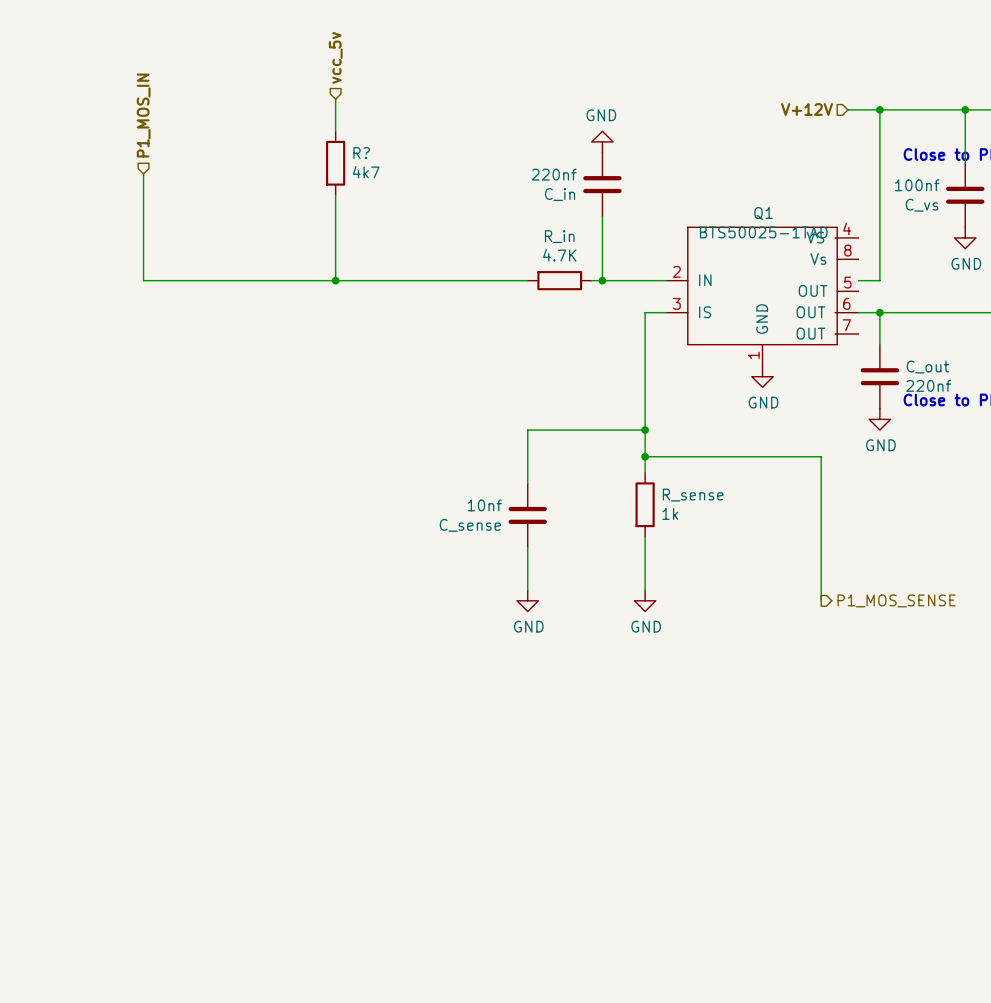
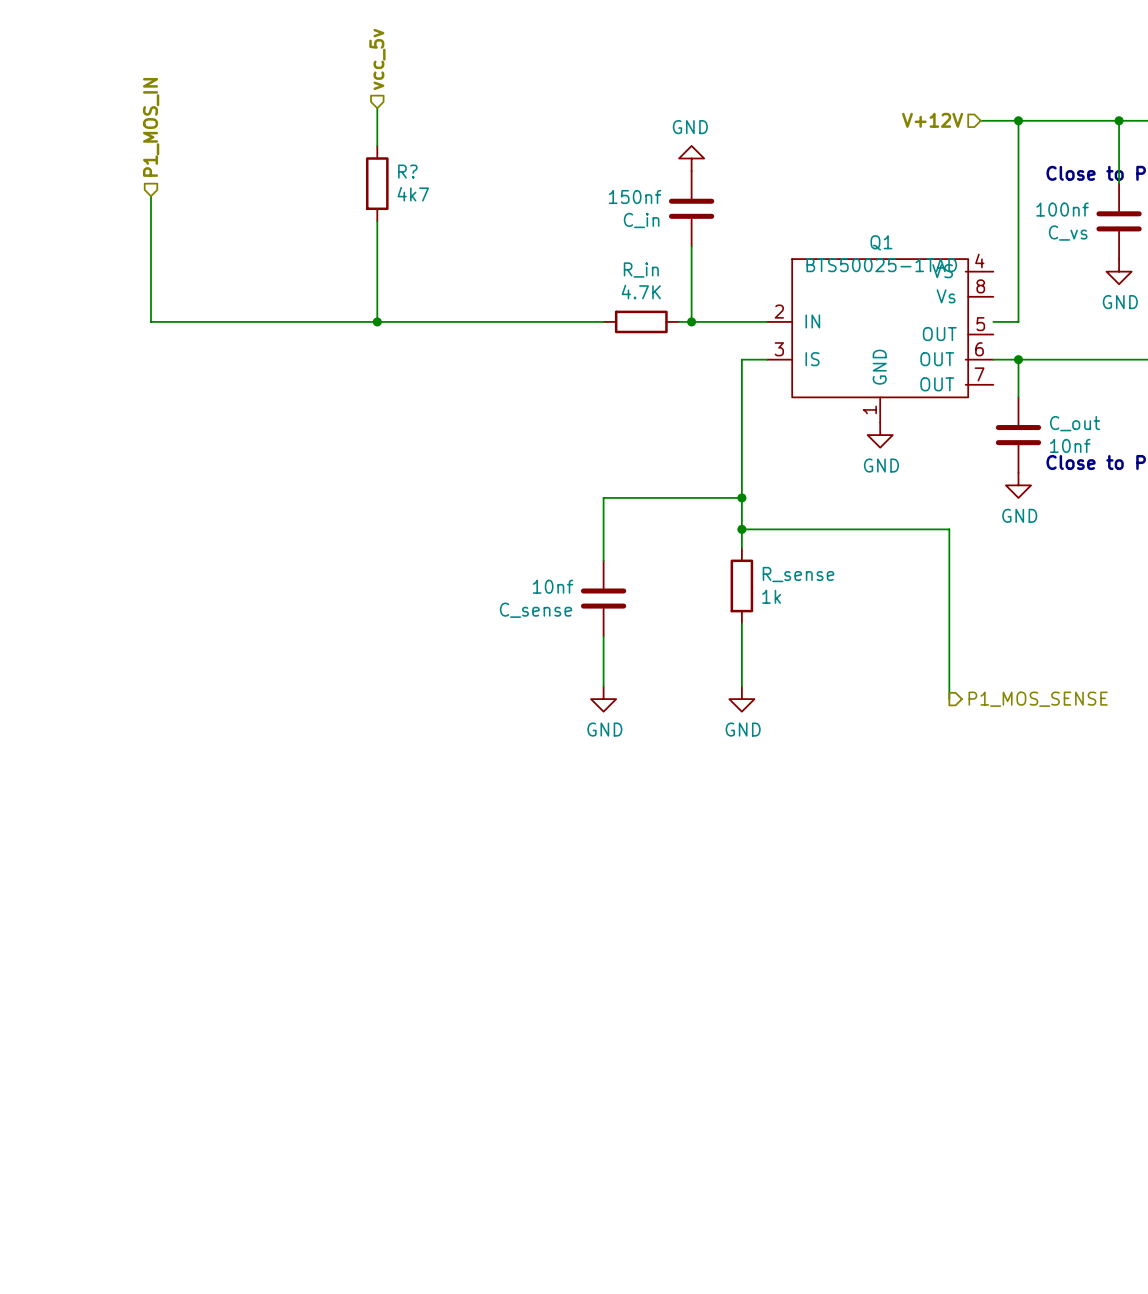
C_in value: 220nf (554, 174) -> 150nf (635, 197)
C_out value: 220nf (928, 385) -> 10nf (1070, 445)

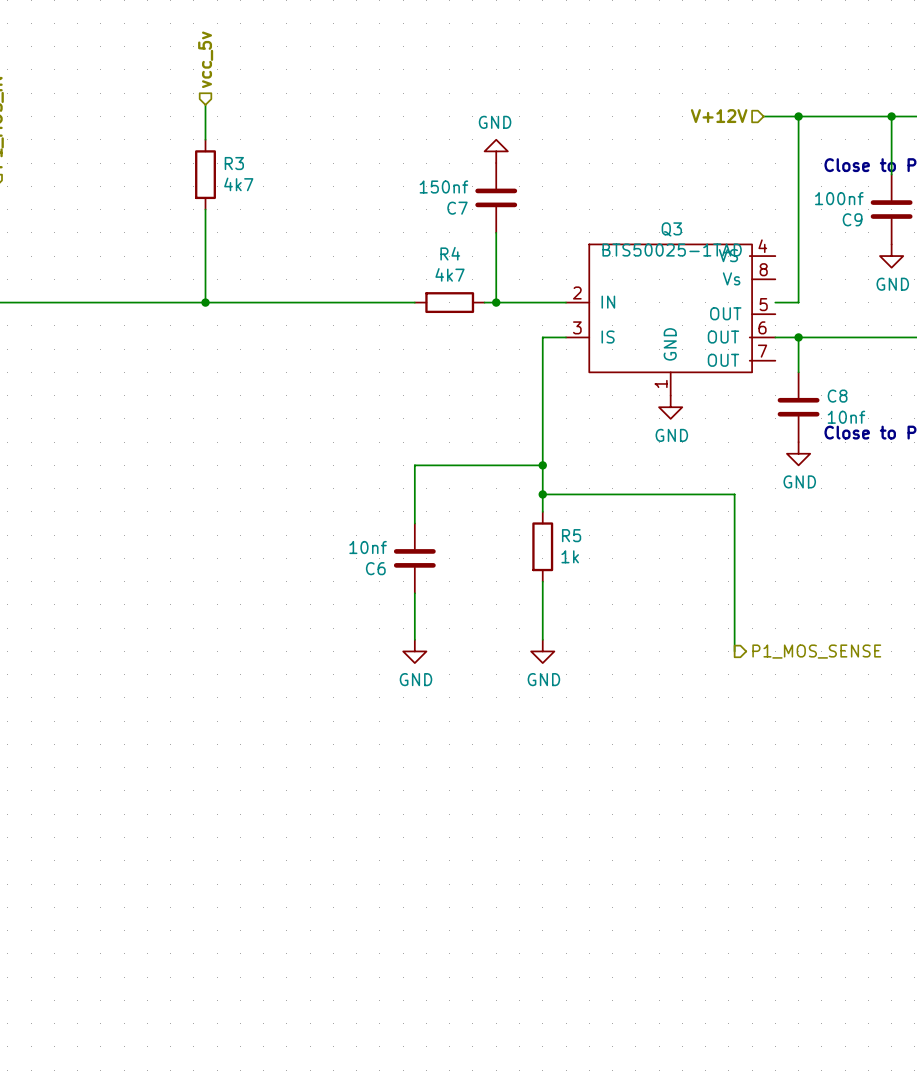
R? name: R? (407, 171) -> R3 (234, 163)
C_in name: C_in (641, 220) -> C7 (457, 208)
C_vs name: C_vs (1068, 233) -> C9 (852, 219)
Q1 name: Q1 (881, 242) -> Q3 (671, 229)
R_in name: R_in (641, 270) -> R4 (450, 253)
R_in value: 4.7K (641, 292) -> 4k7 (449, 274)
C_out name: C_out (1075, 423) -> C8 (837, 396)
R_sense name: R_sense (798, 574) -> R5 (571, 535)
C_sense name: C_sense (535, 610) -> C6 (375, 568)

